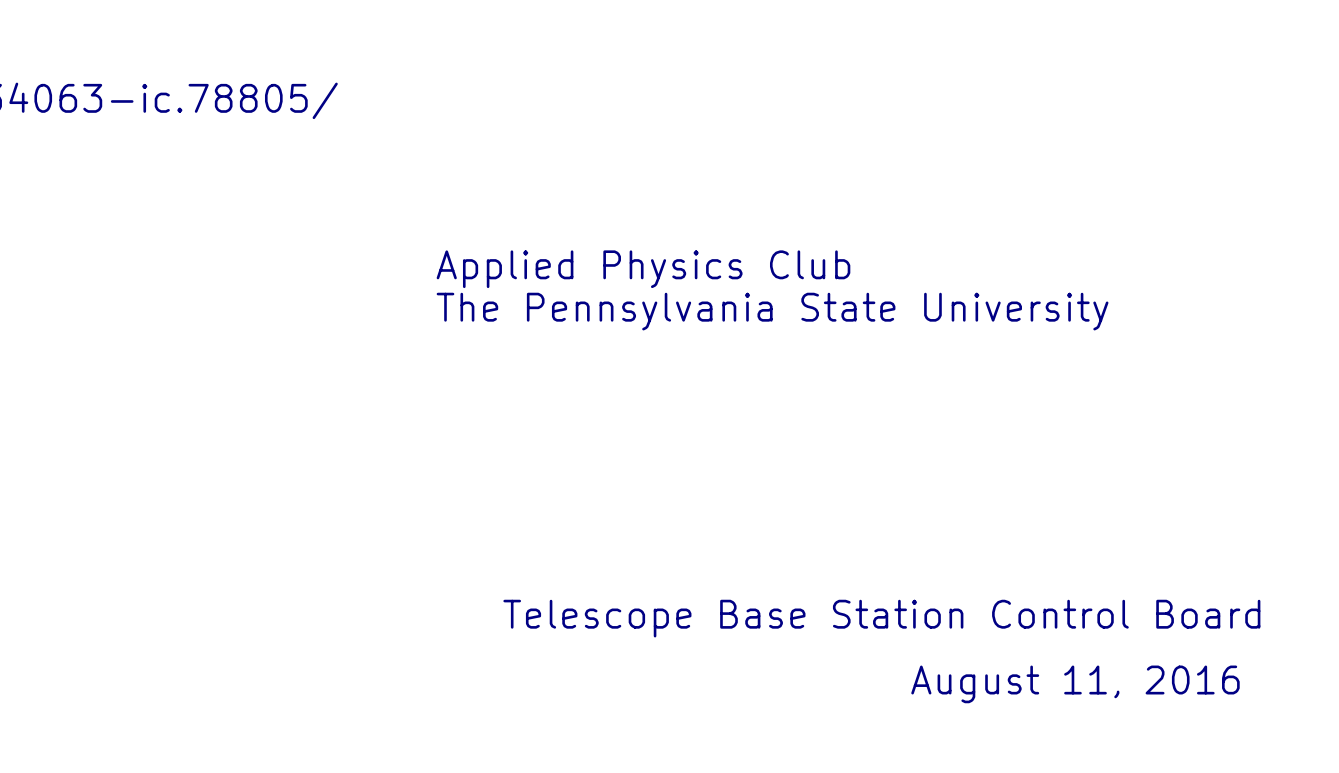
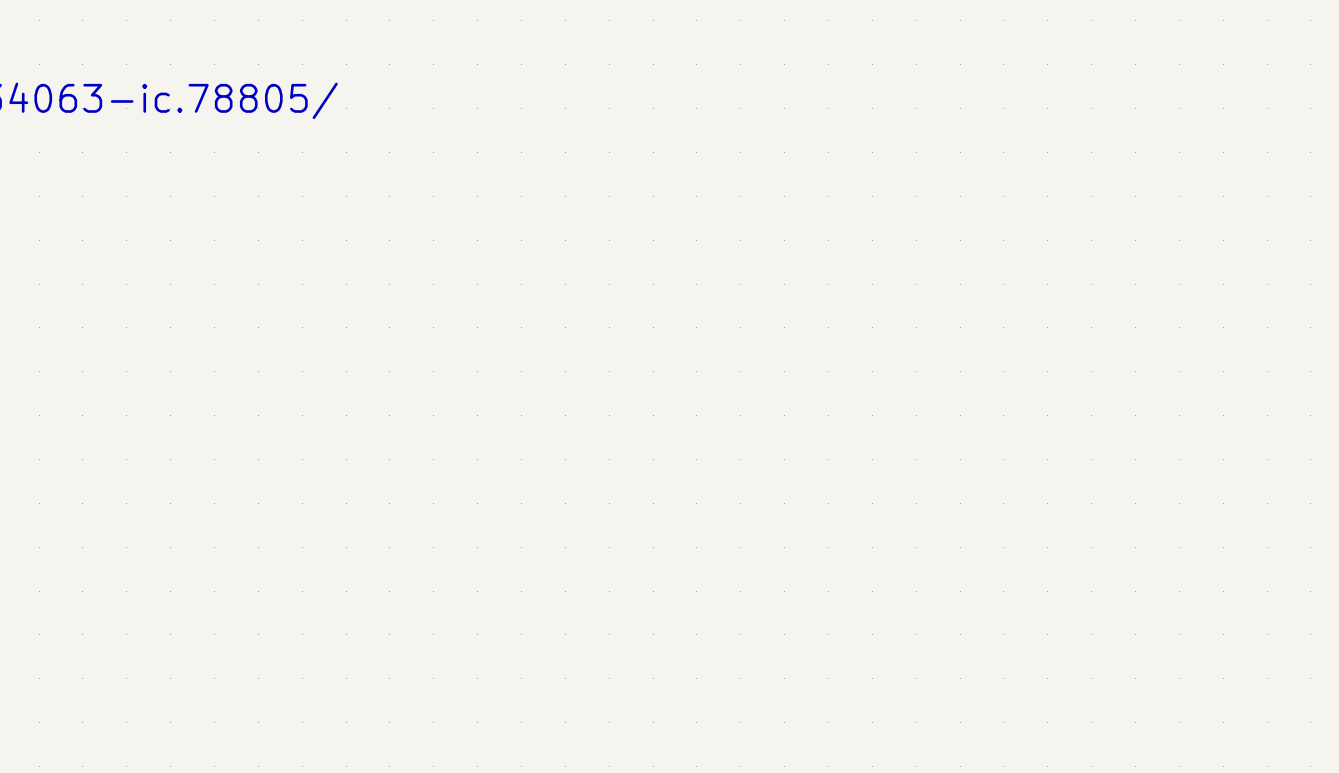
text: Applied Physics Club (643, 269) -> none
text: The Pennsylvania State University (772, 311) -> none
text: Telescope Base Station Control Board (881, 618) -> none
text: August 11, 2016 (1075, 684) -> none

